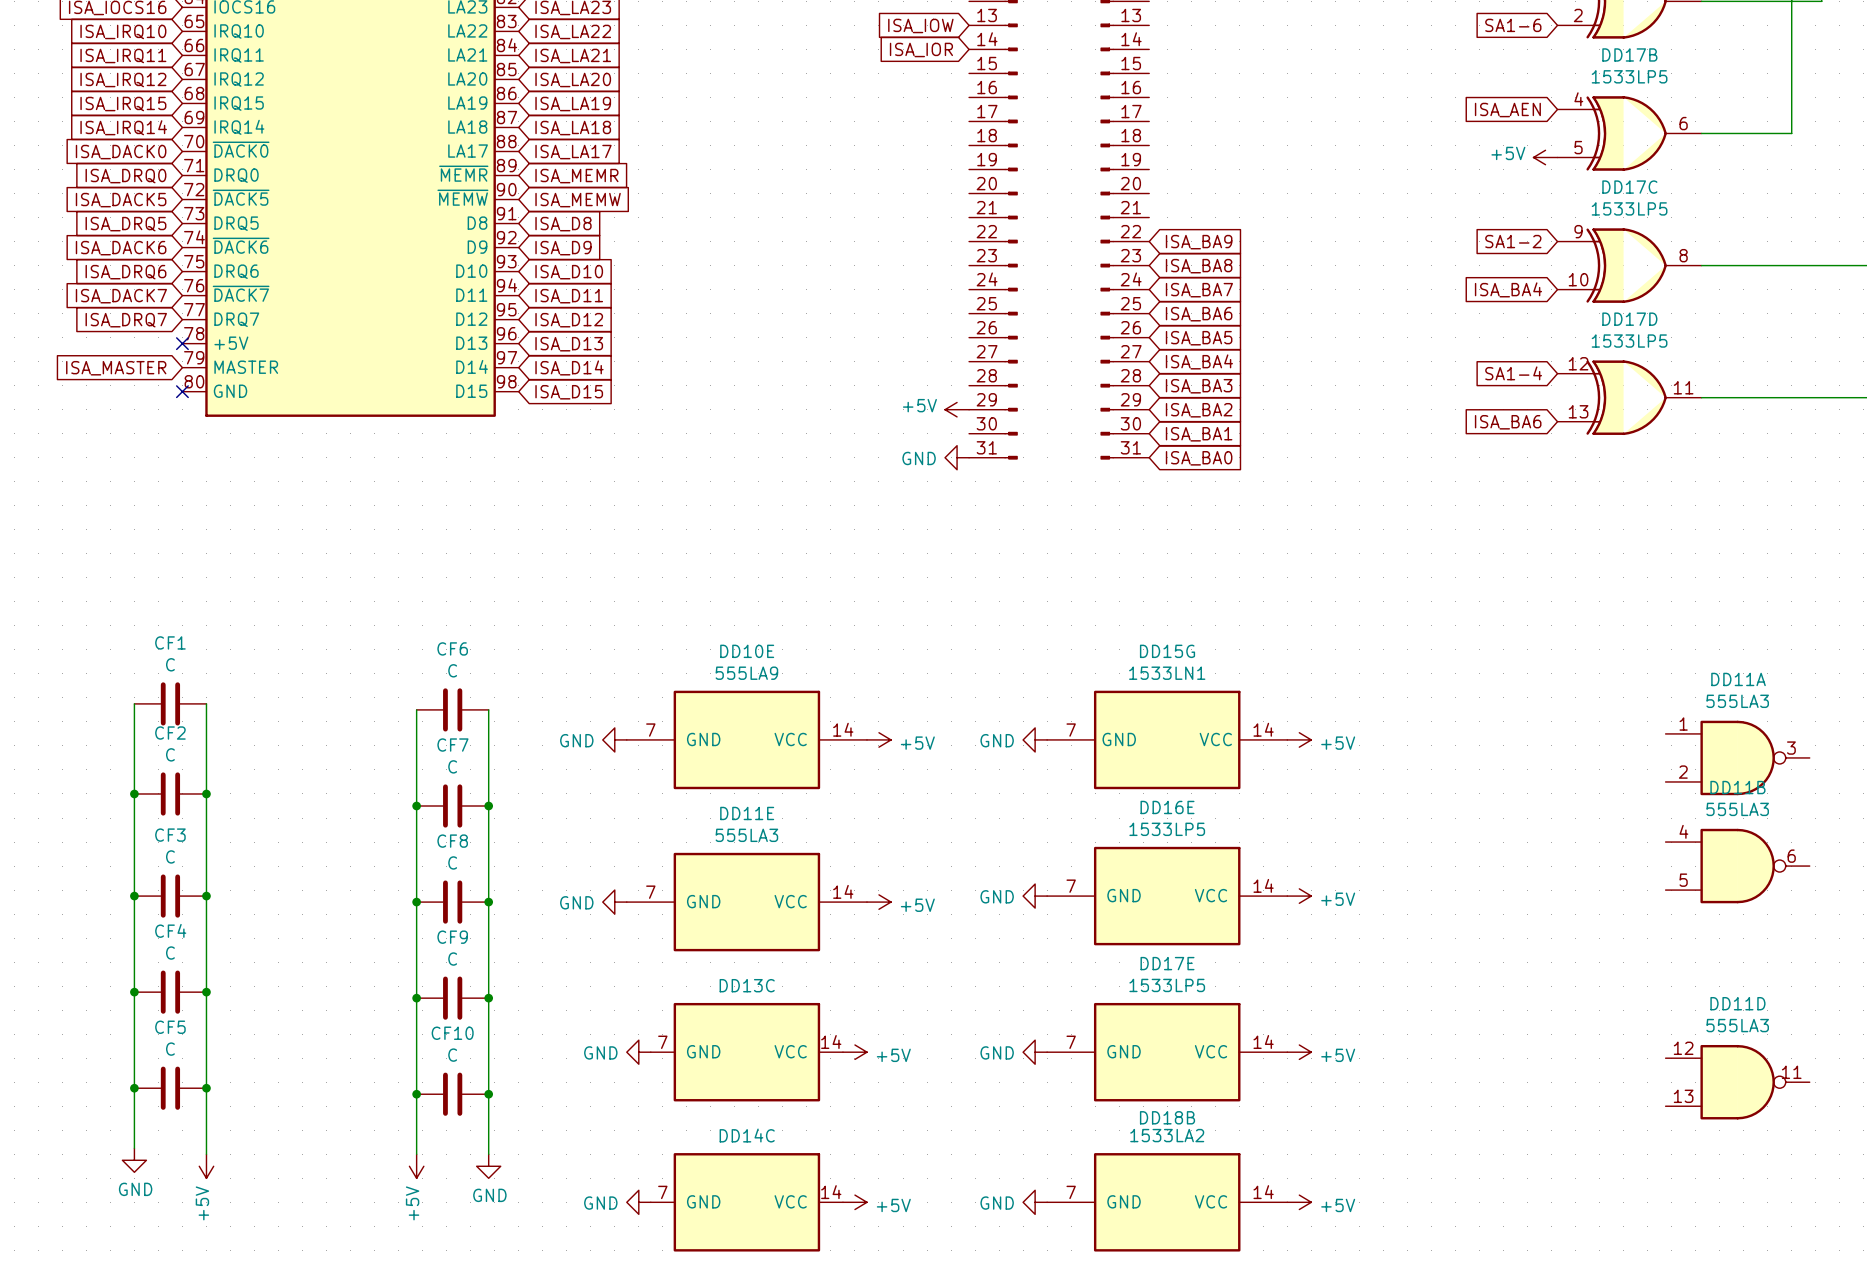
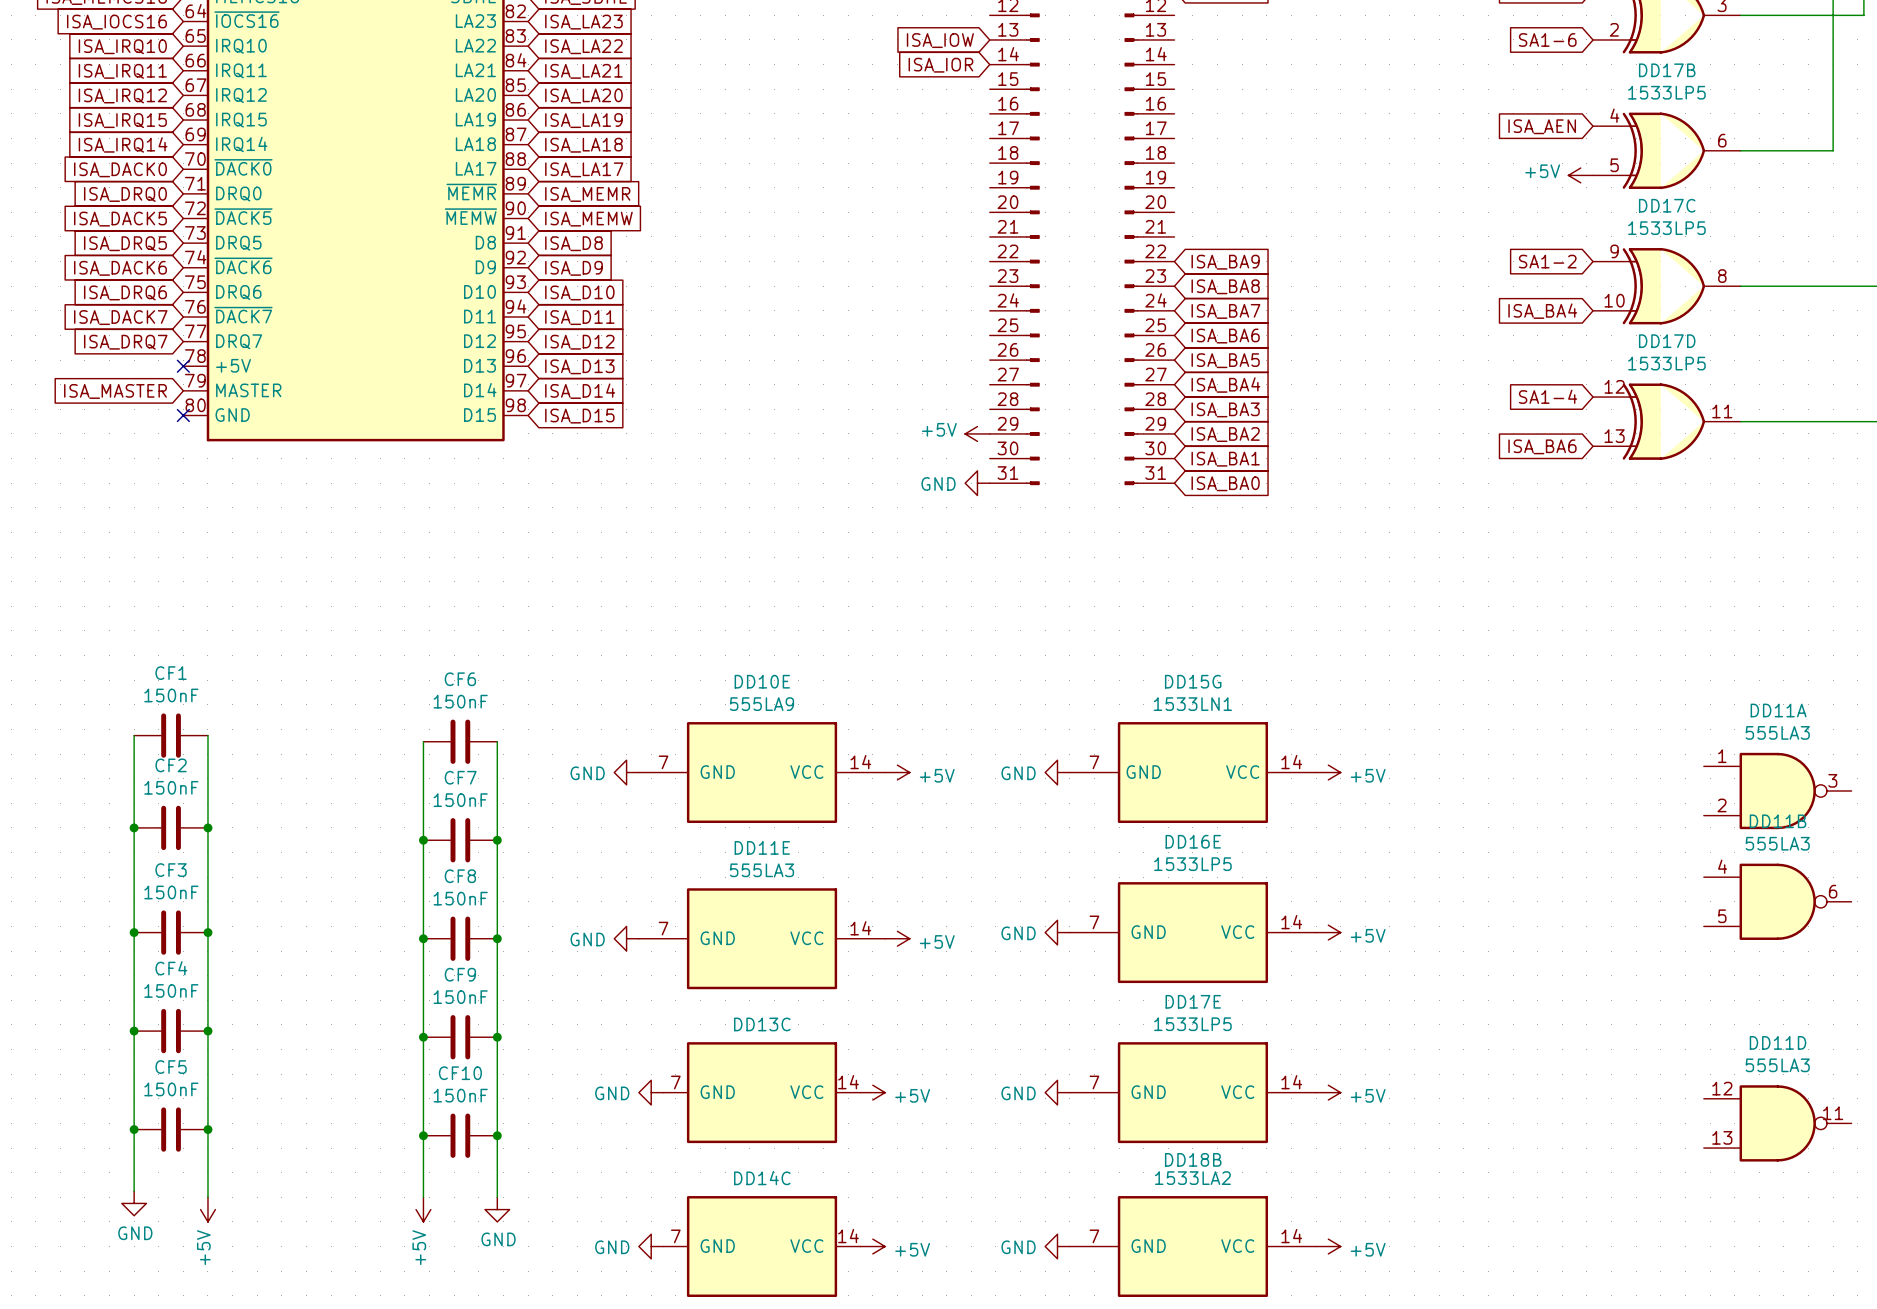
CF1 value: C (170, 664) -> 150nF (171, 695)
CF6 value: C (452, 670) -> 150nF (460, 701)
CF2 value: C (170, 754) -> 150nF (171, 787)
CF7 value: C (452, 766) -> 150nF (460, 800)
CF3 value: C (170, 856) -> 150nF (171, 892)
CF8 value: C (452, 862) -> 150nF (460, 898)
CF4 value: C (170, 953) -> 150nF (171, 990)
CF9 value: C (452, 959) -> 150nF (460, 997)
CF5 value: C (170, 1049) -> 150nF (171, 1089)
CF10 value: C (452, 1055) -> 150nF (460, 1095)

